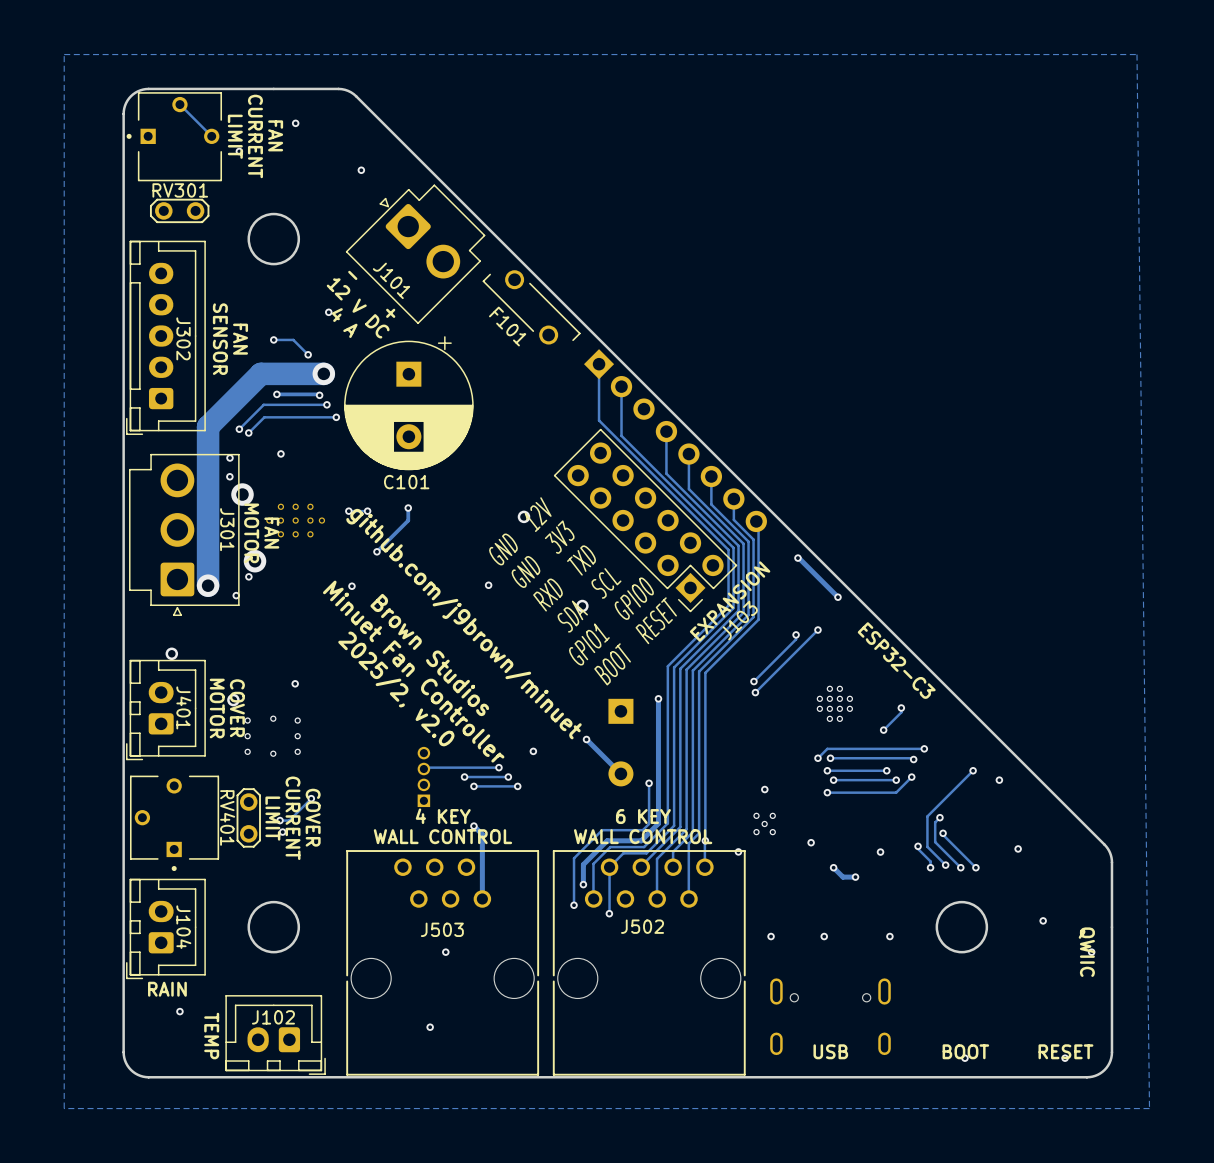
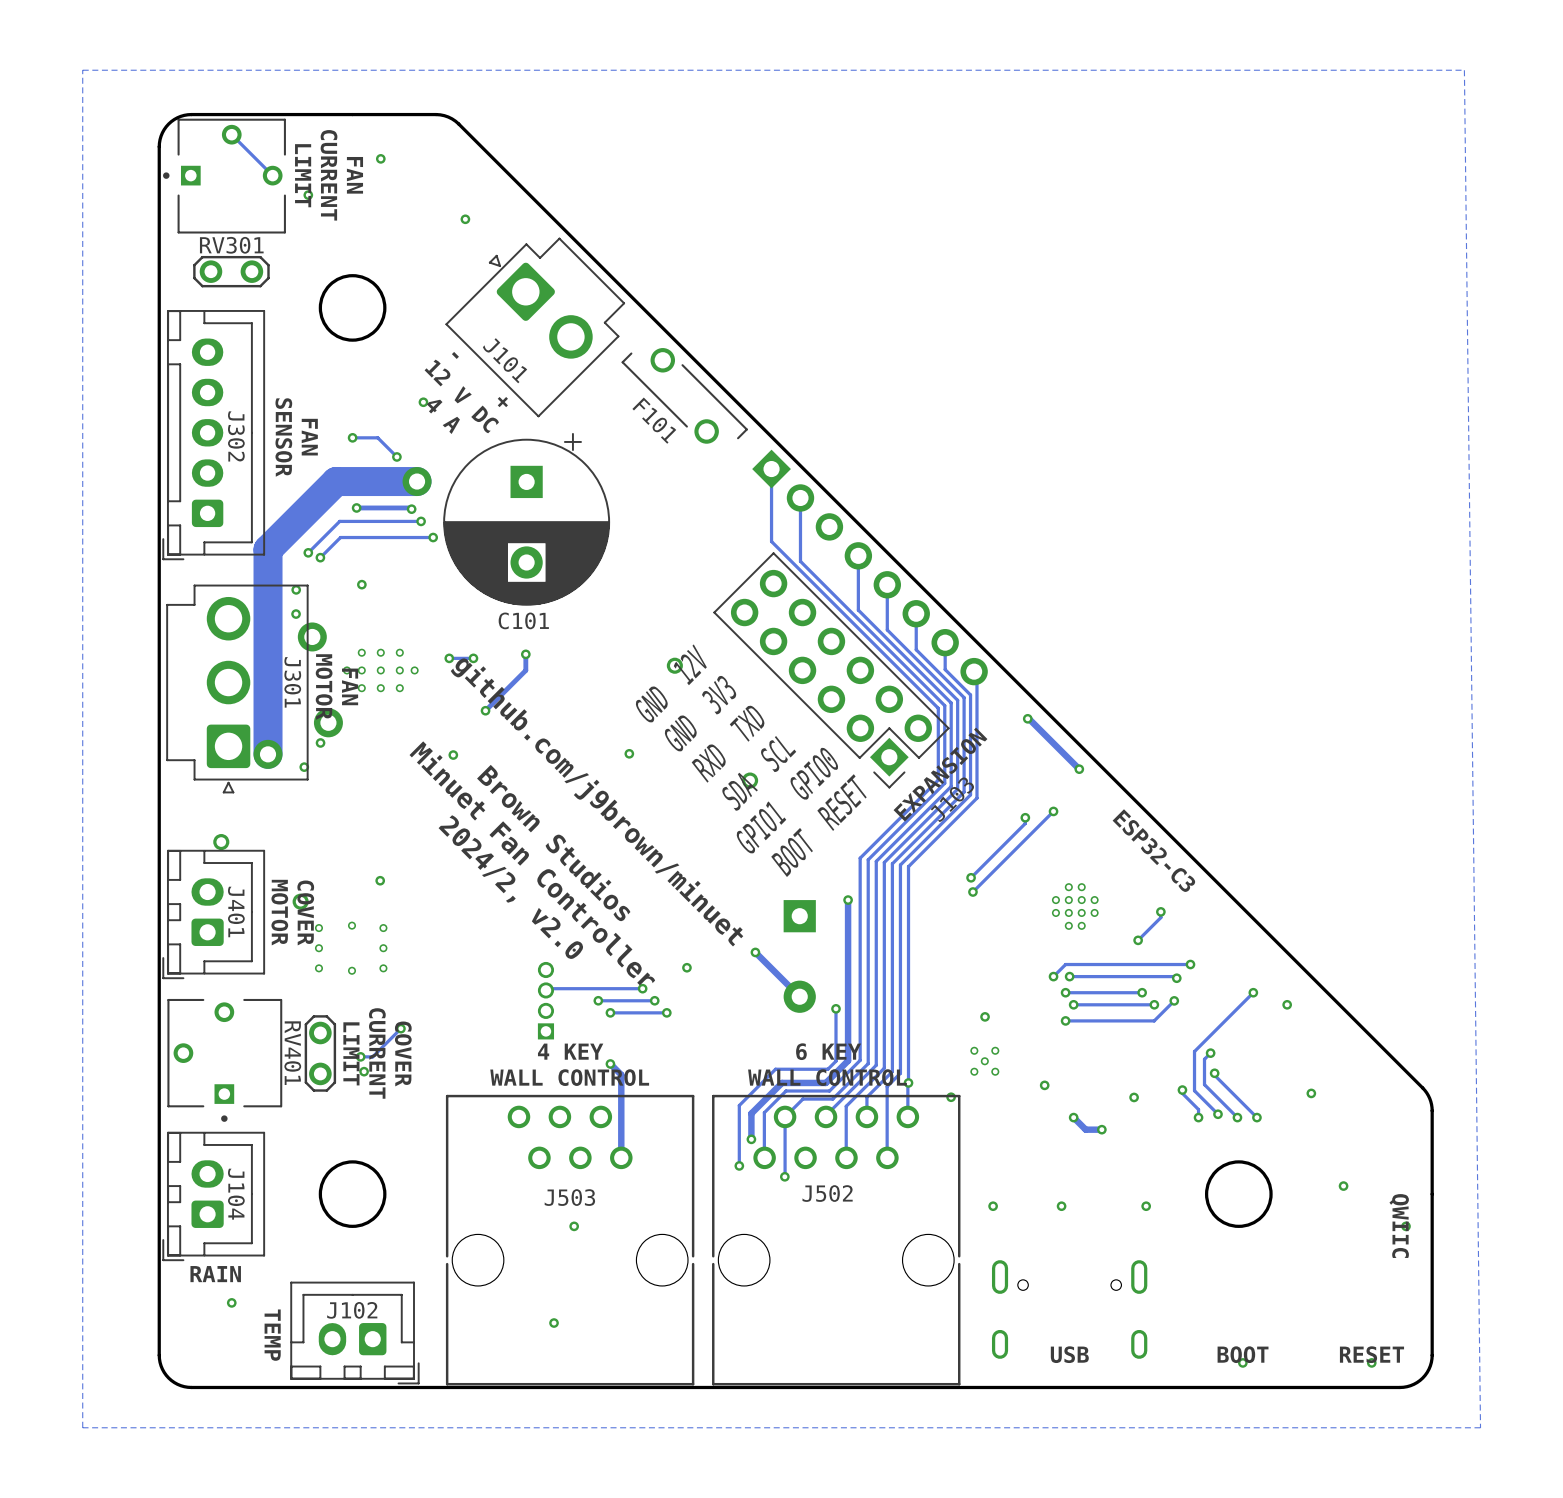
text: 2025/2, v2.0 (396, 688) -> 2024/2, v2.0 (511, 887)

